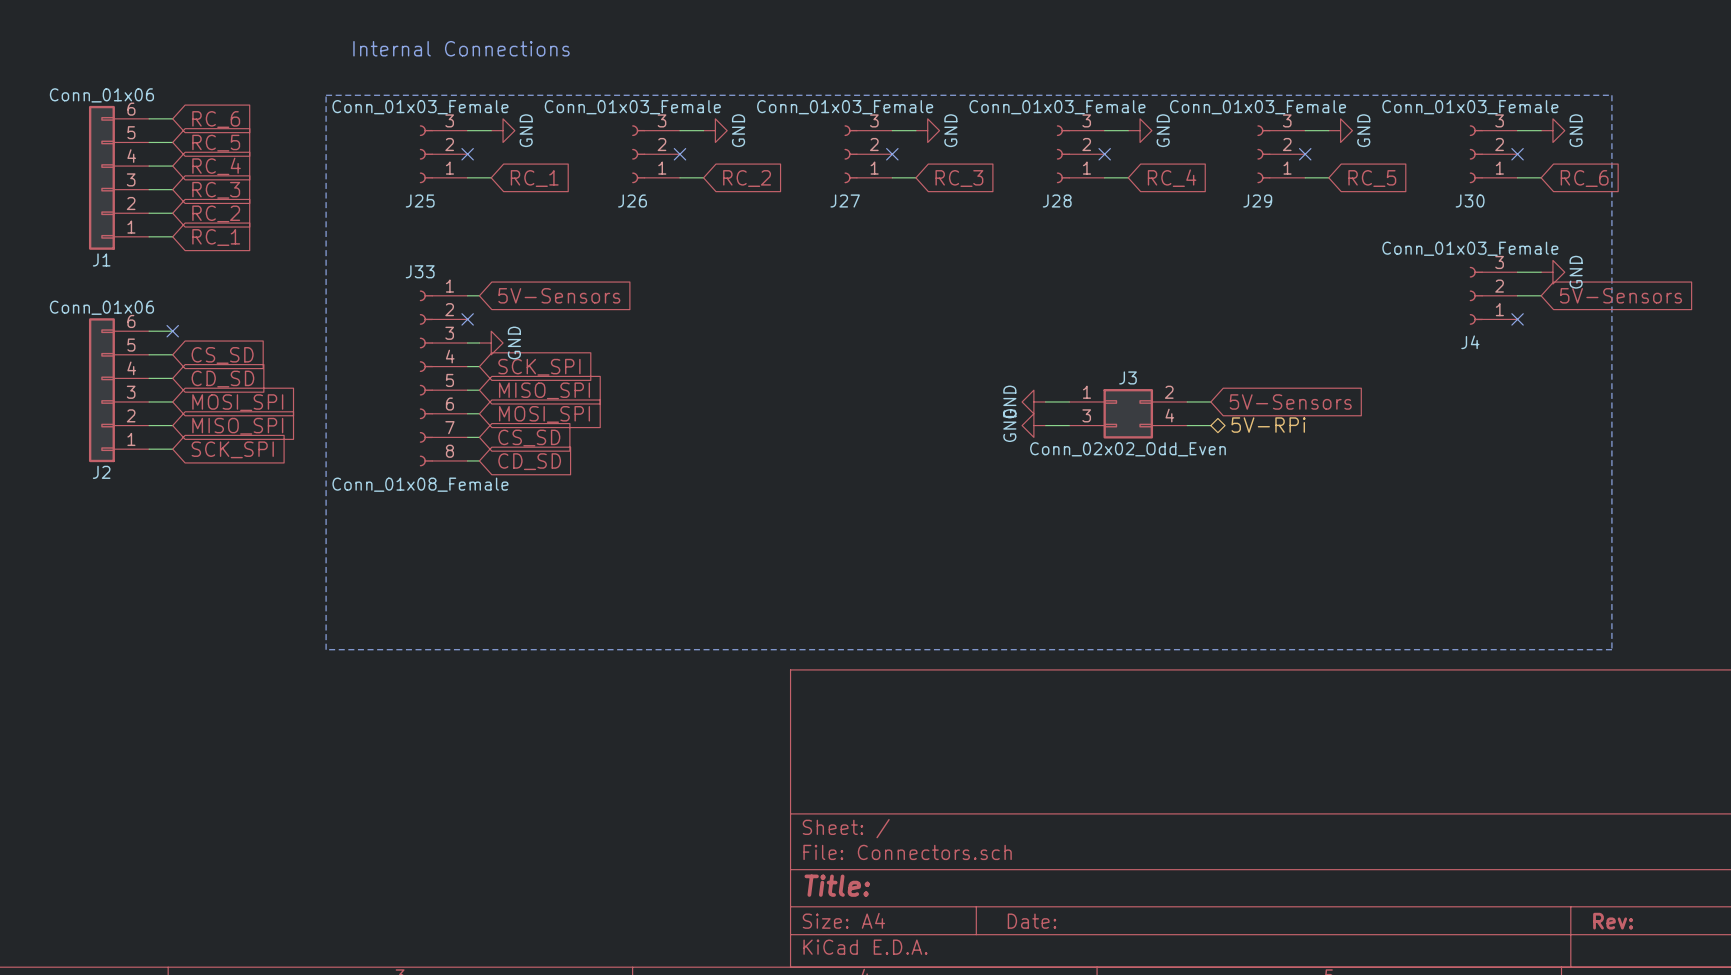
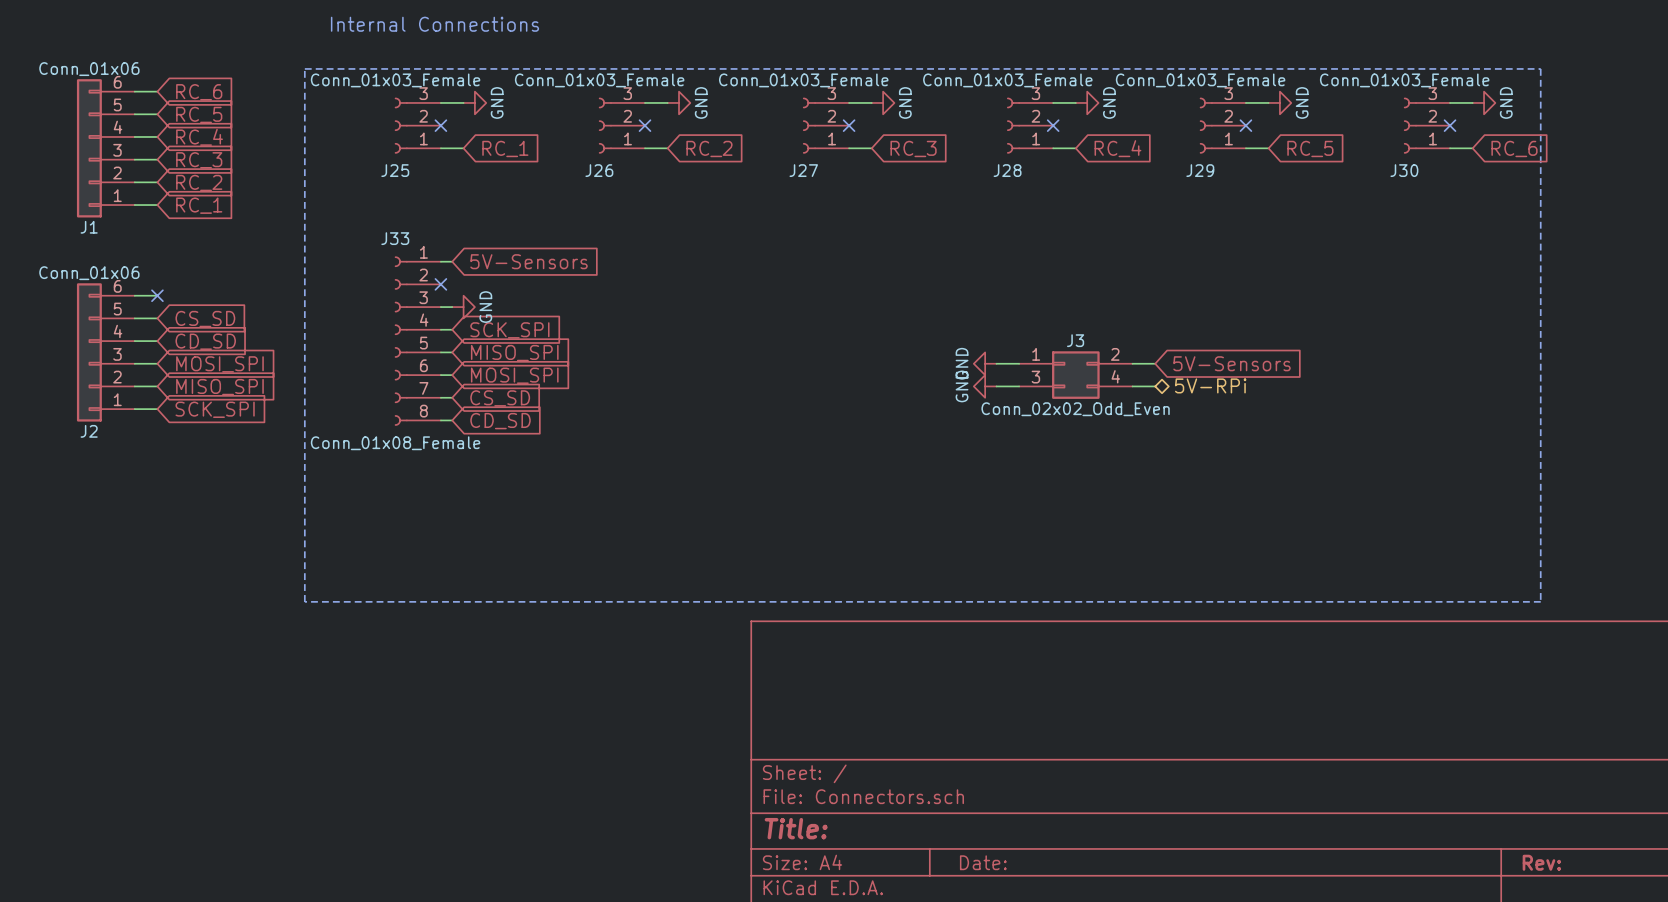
wire: (1517, 272) (1541, 272) -> none
power symbol: GND (1552, 272) -> none
J4: Conn_01x03_Female (1493, 295) -> none
wire: (1517, 295) (1541, 295) -> none
global label: 5V-Sensors (1621, 295) -> none
no-connect mark: (1517, 319) -> none

